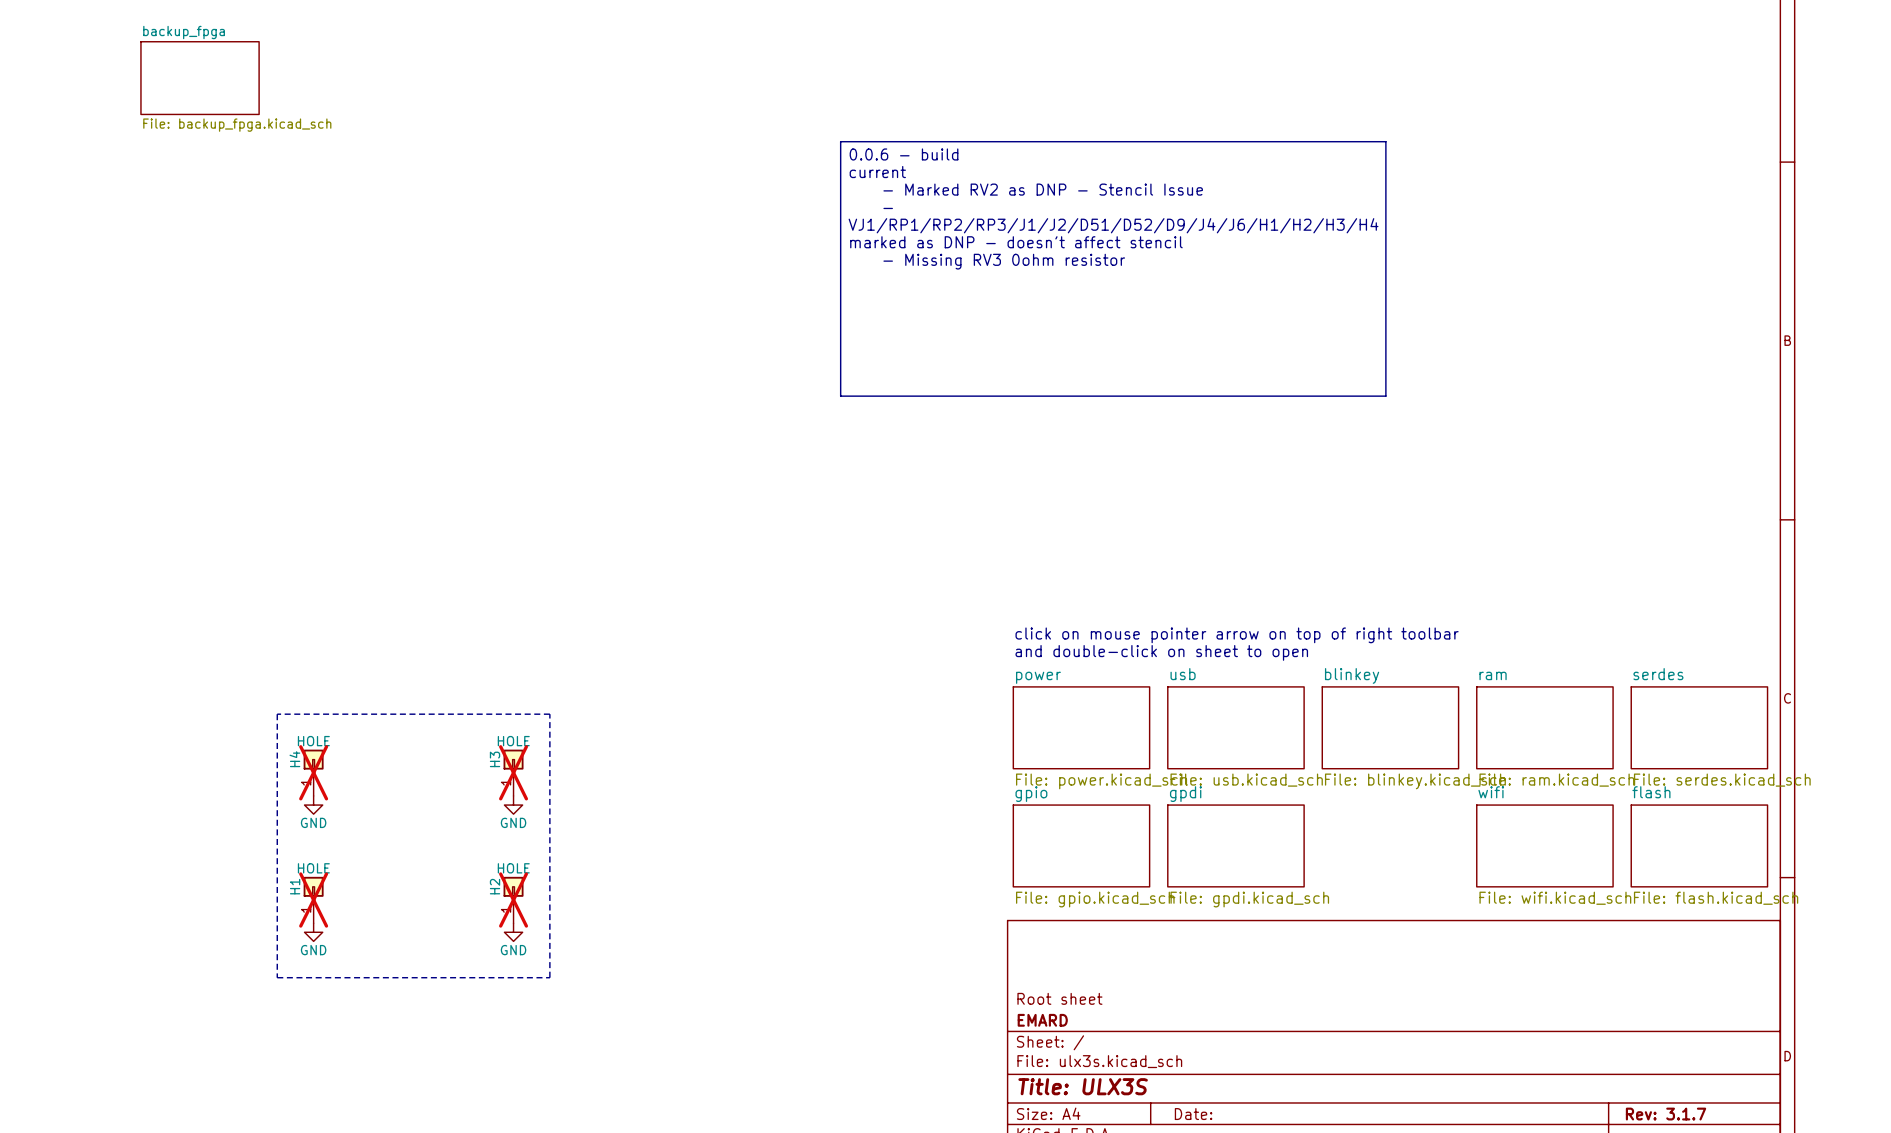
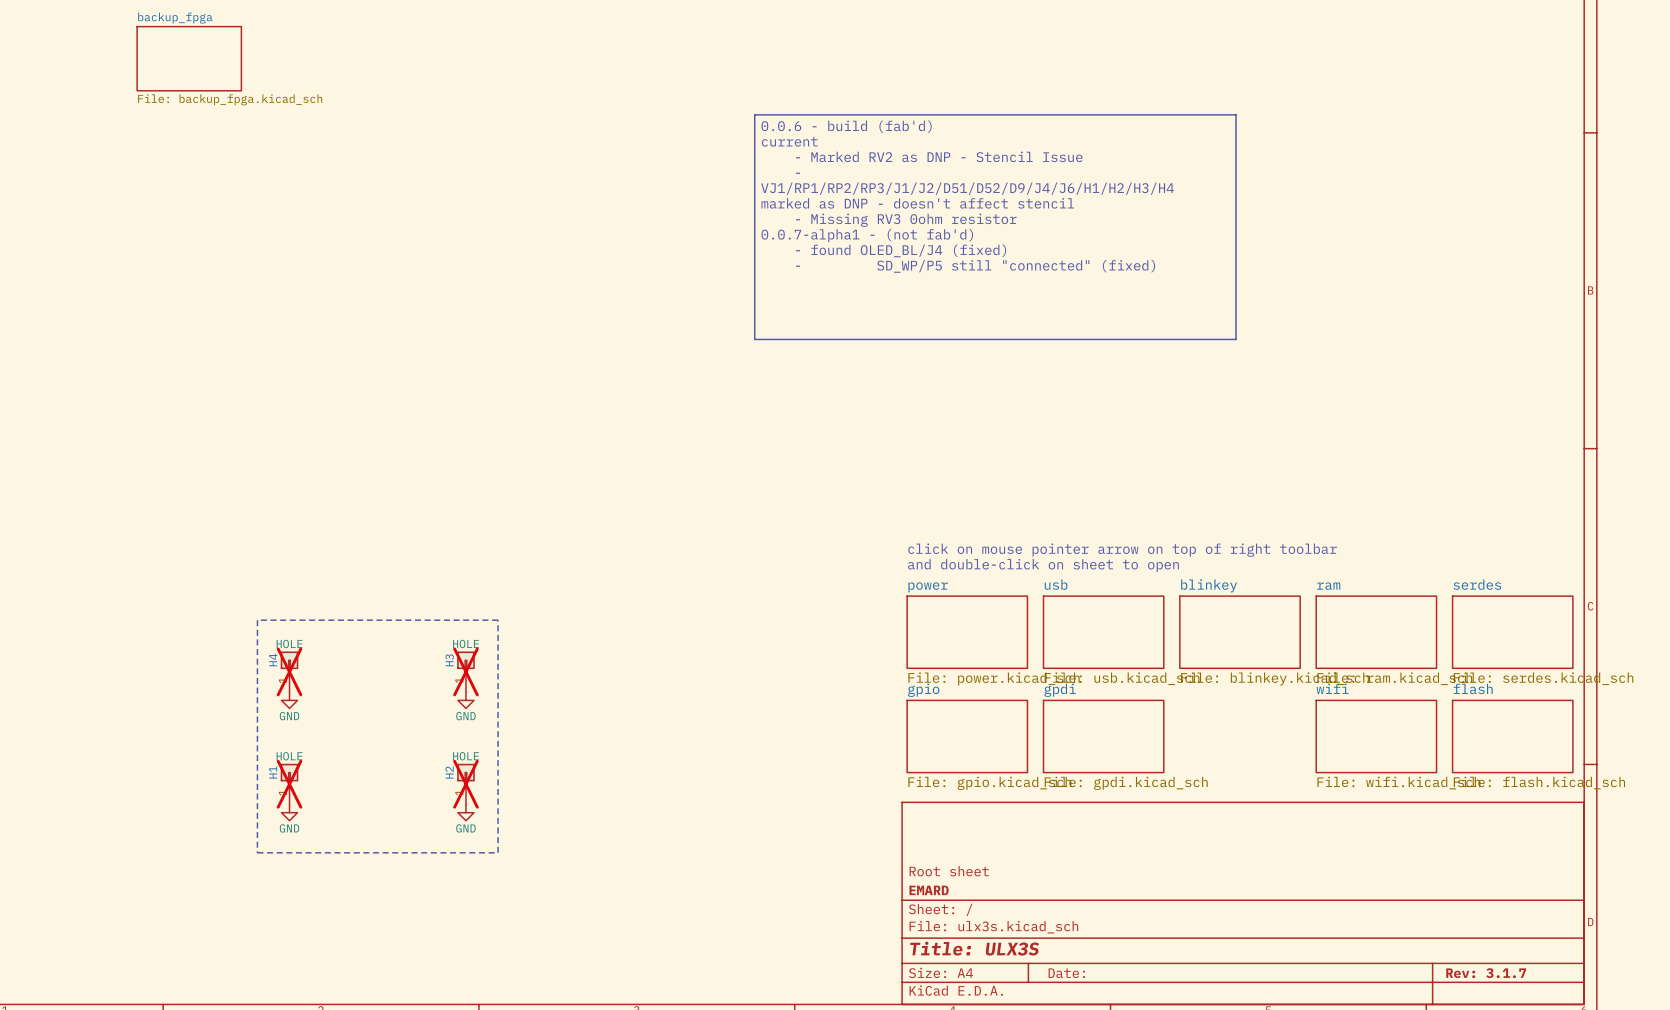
text: 0.0.6 - build (904, 154) -> 0.0.6 - build (fab'd) (846, 126)
text: none -> 0.0.7-alpha1 - (not fab'd) (867, 235)
text: none -> - found OLED_BL/J4 (fixed) (901, 250)
text: none -> - SD_WP/P5 still "connected" (fixed) (975, 266)

